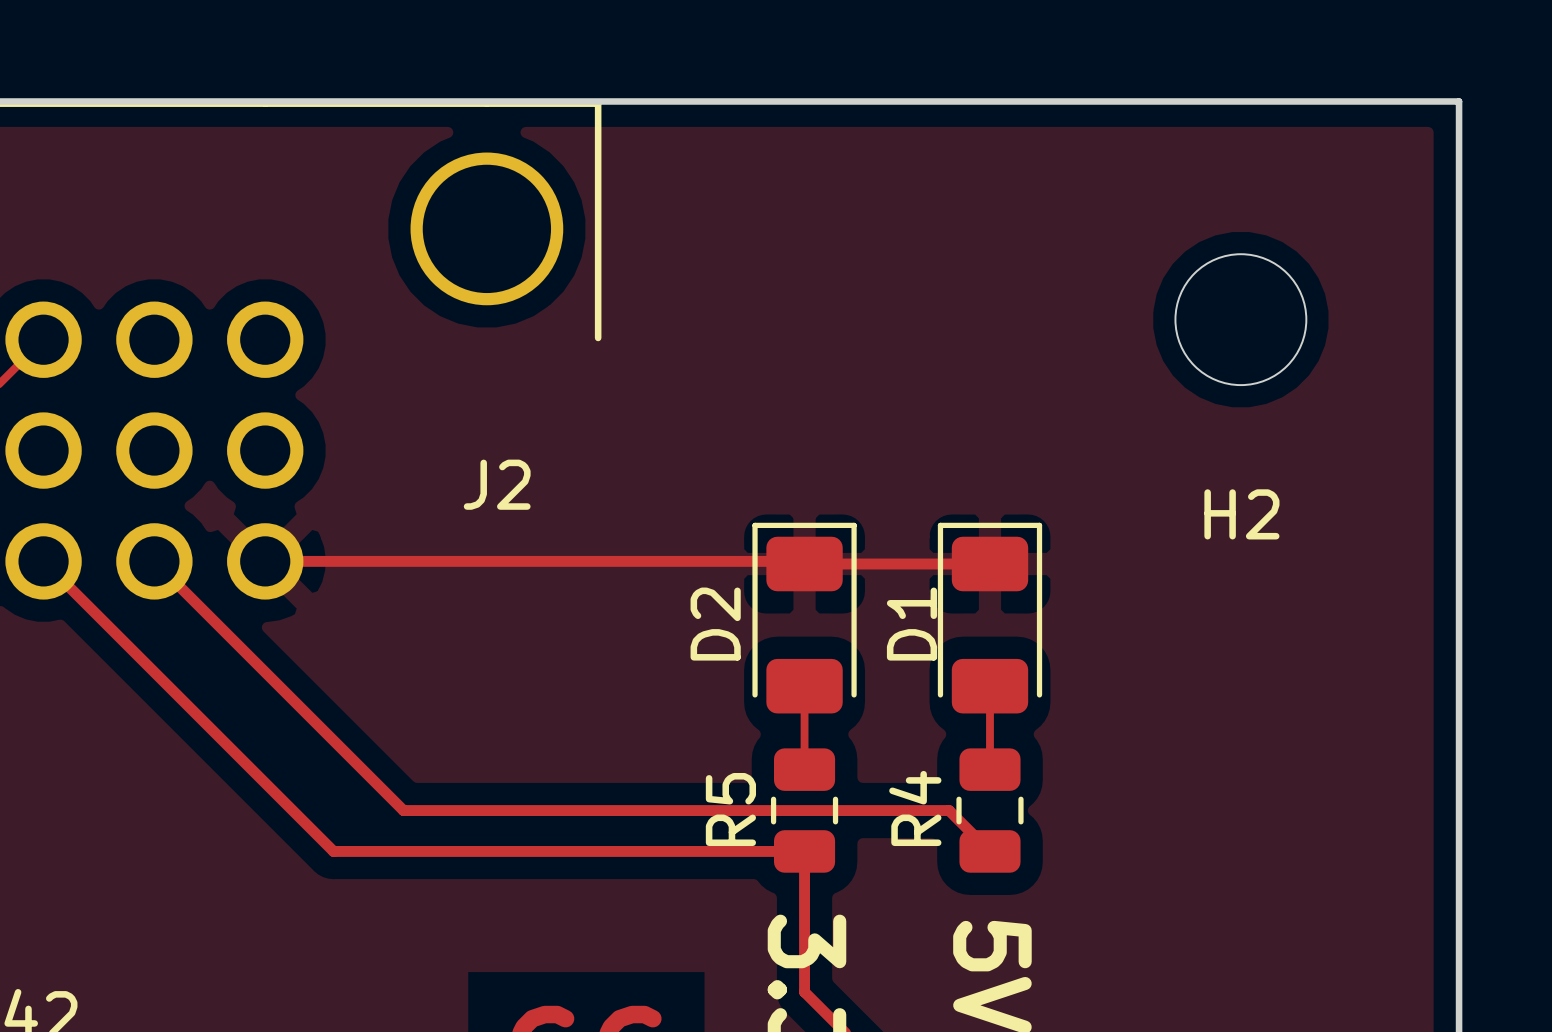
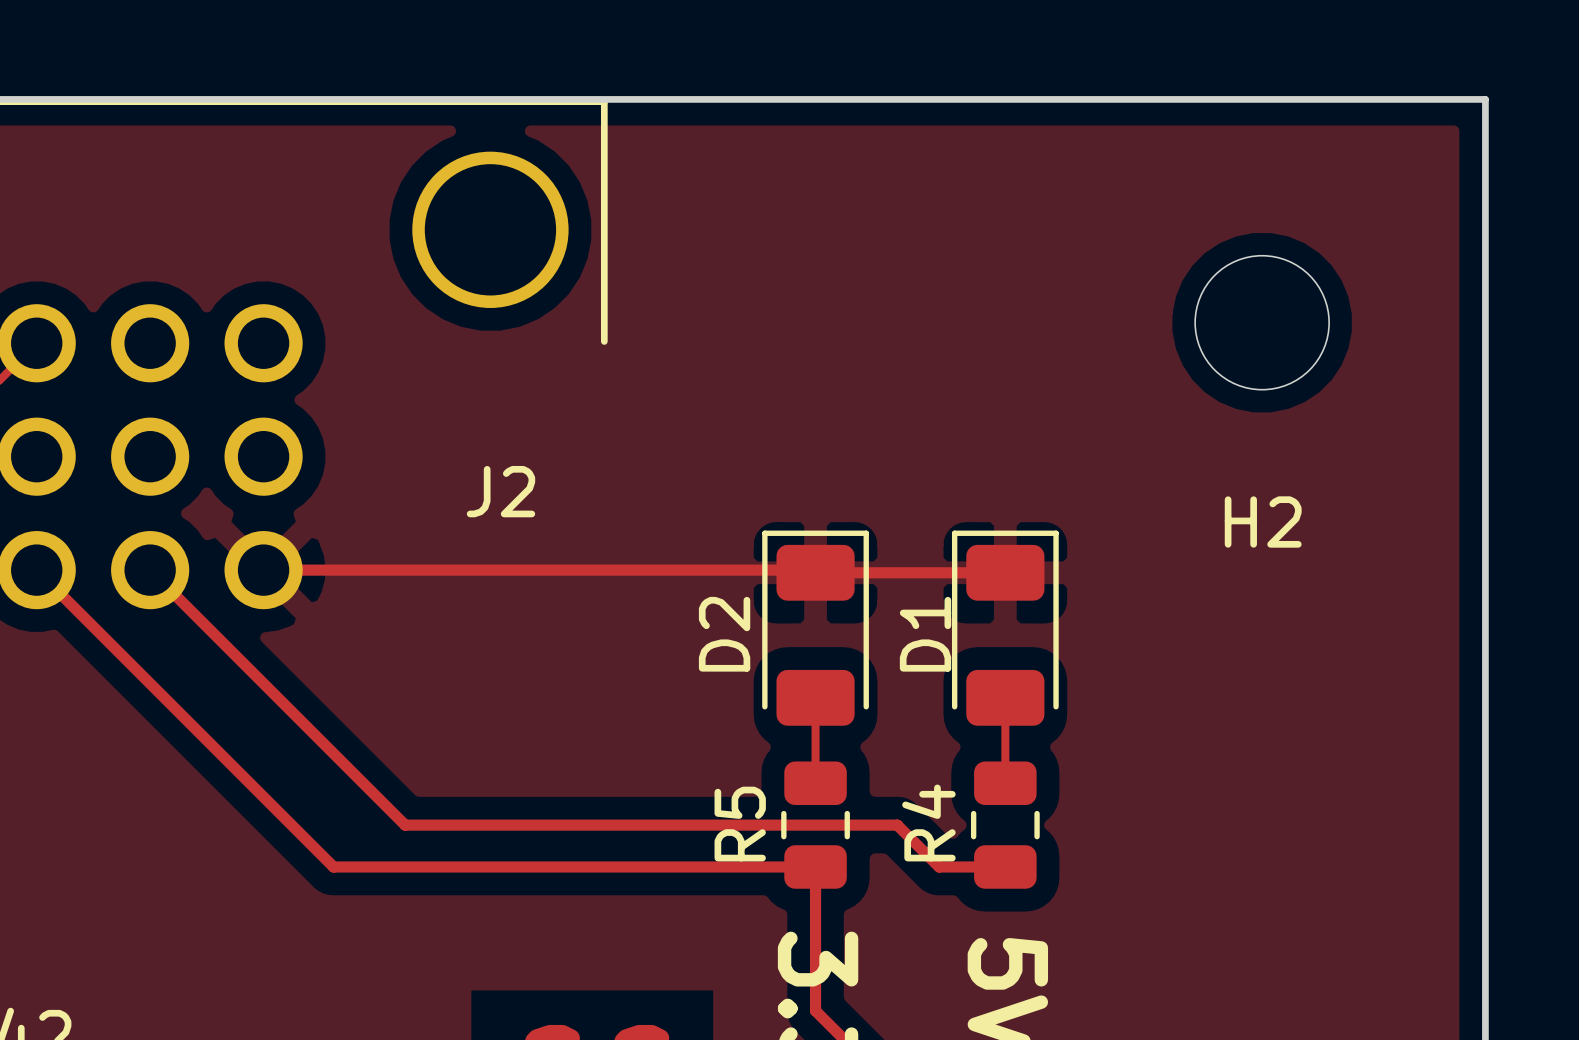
track: (884, 810) (949, 810) (989, 851) -> (897, 825) (939, 866) (1005, 866)

